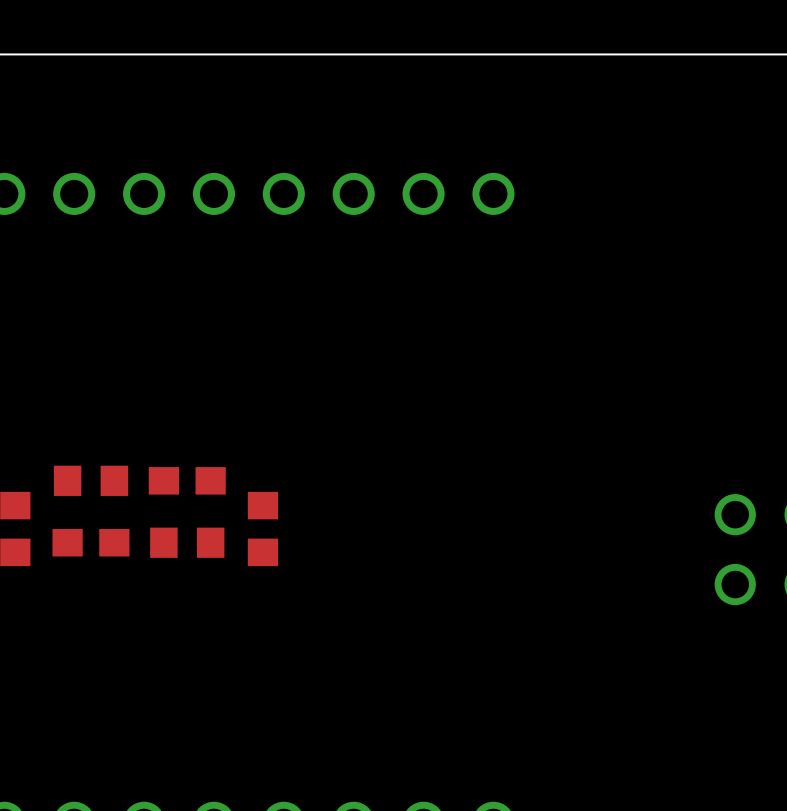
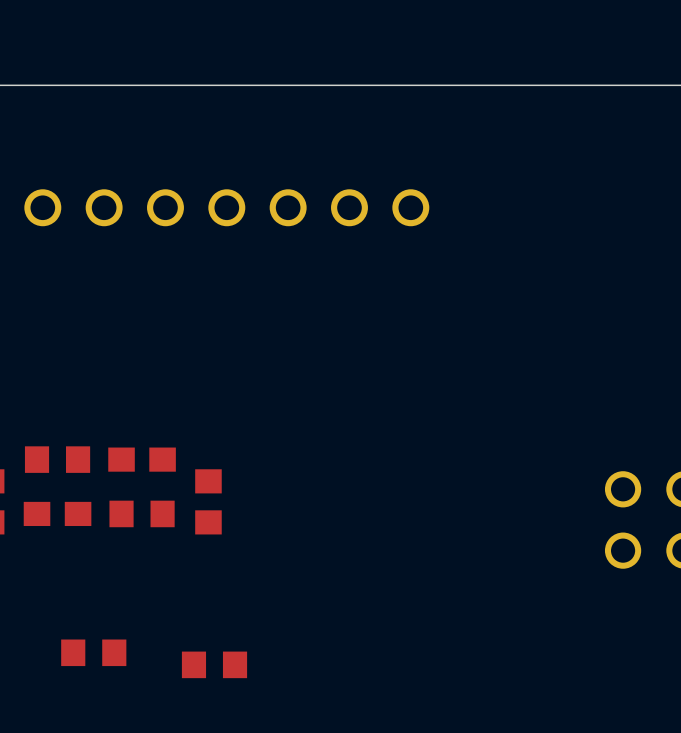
part: none -> (93, 652)
part: none -> (214, 664)

